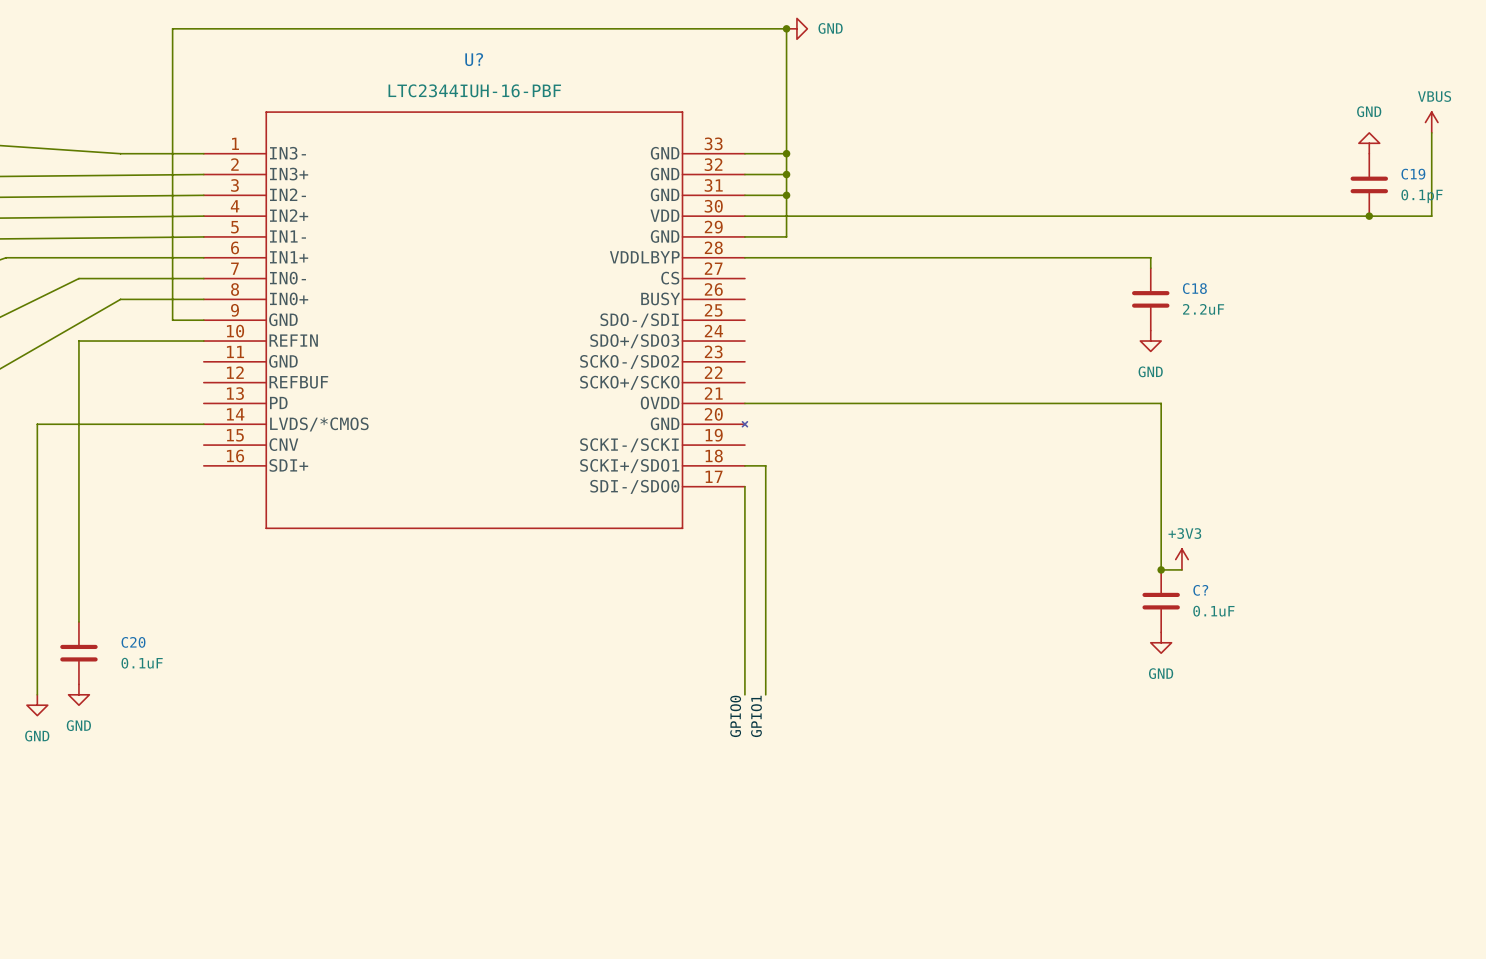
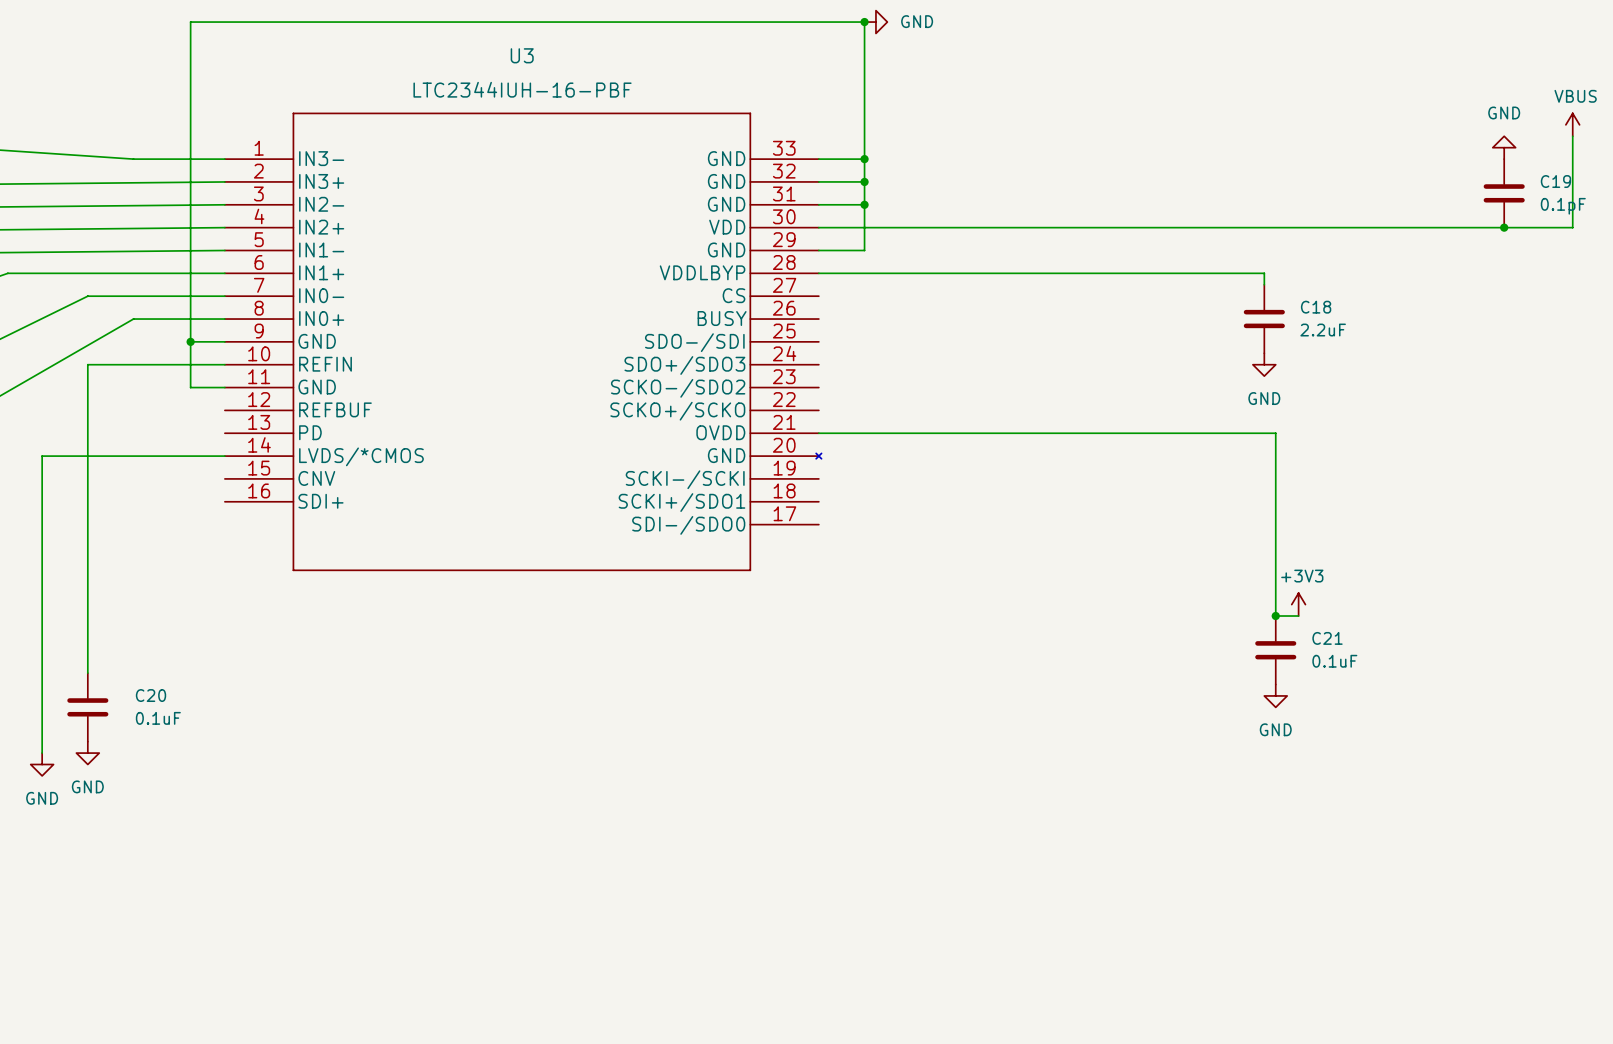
U? name: U? (474, 59) -> U3 (522, 55)
wire: none -> (190, 341) (190, 387) (224, 387)
junction: none -> (190, 341)
wire: (744, 465) (765, 465) (765, 694) -> none
wire: (744, 486) (744, 694) -> none
C? name: C? (1200, 590) -> C21 (1327, 638)
label: GPIO0 (735, 716) -> none
label: GPIO1 (756, 716) -> none

